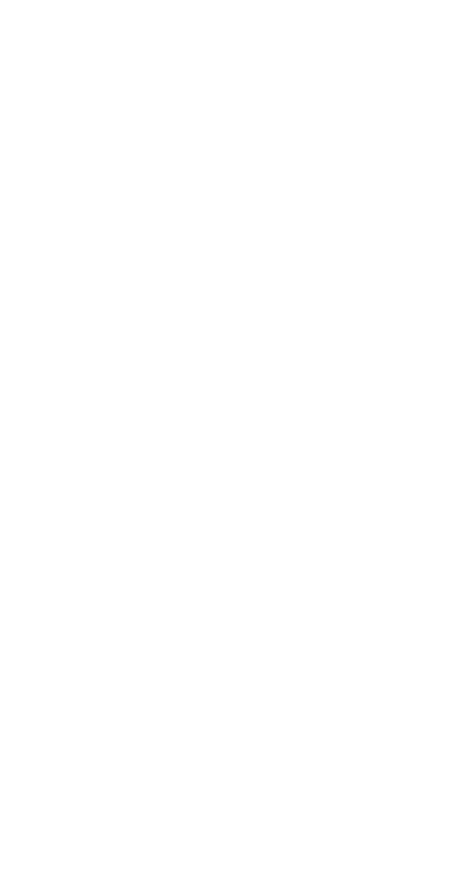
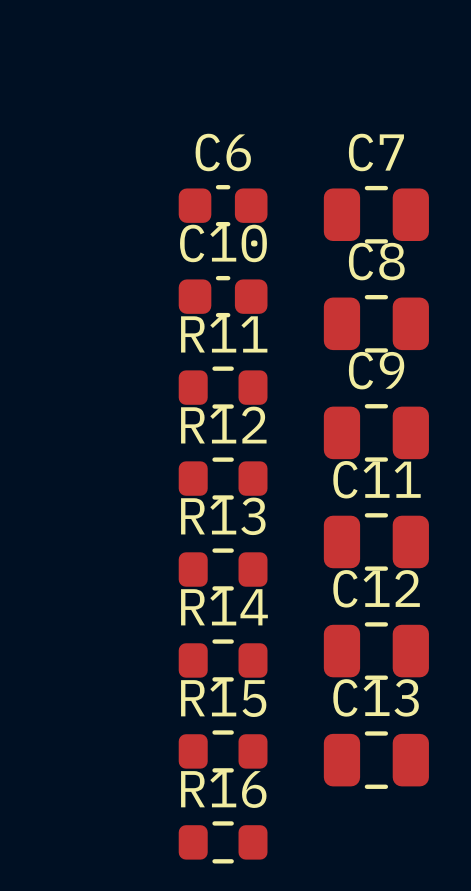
C6: none -> (223, 205)
C7: none -> (376, 214)
C10: none -> (223, 296)
C8: none -> (376, 323)
R11: none -> (223, 387)
C9: none -> (376, 432)
R12: none -> (223, 478)
C11: none -> (376, 541)
R13: none -> (223, 569)
C12: none -> (376, 651)
R14: none -> (223, 660)
R15: none -> (223, 751)
C13: none -> (376, 760)
R16: none -> (223, 842)

